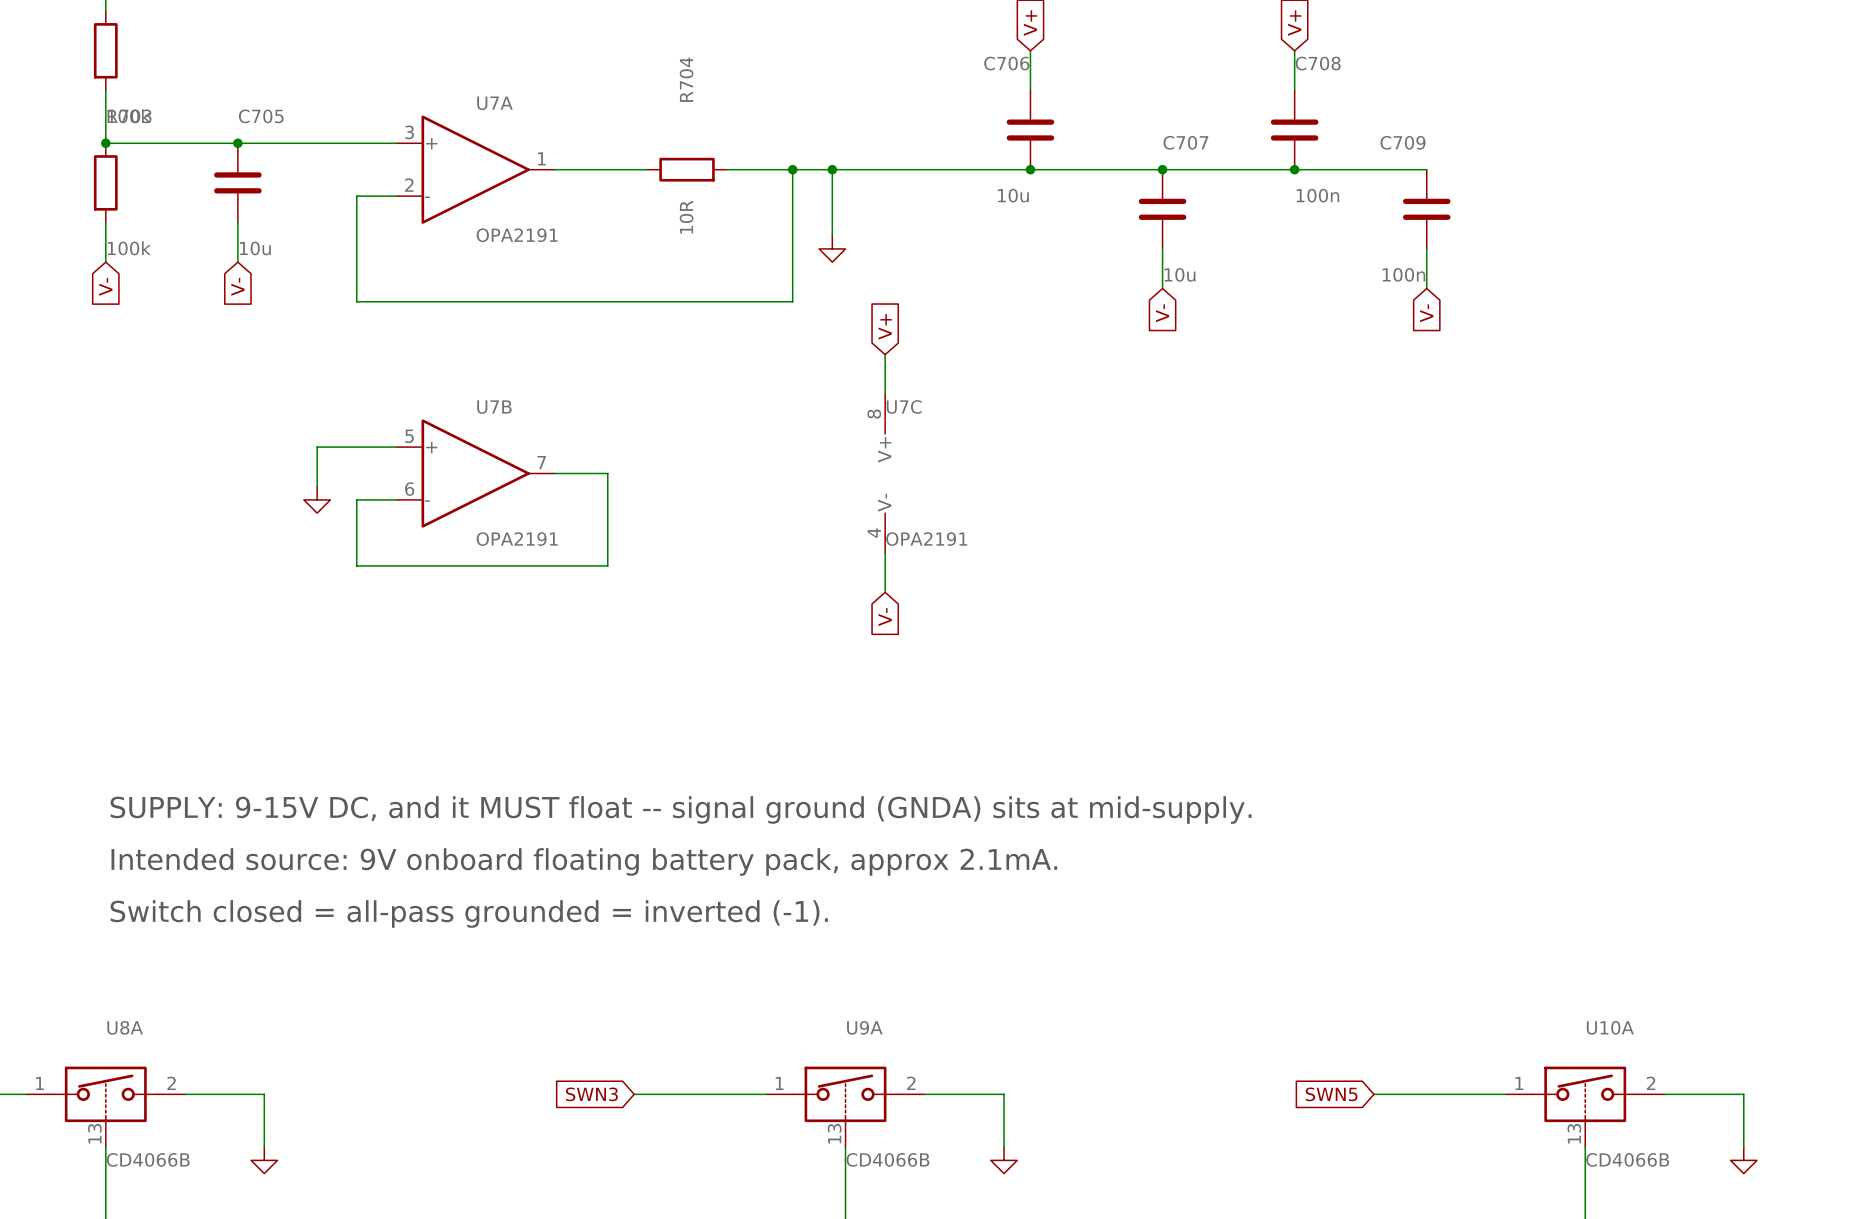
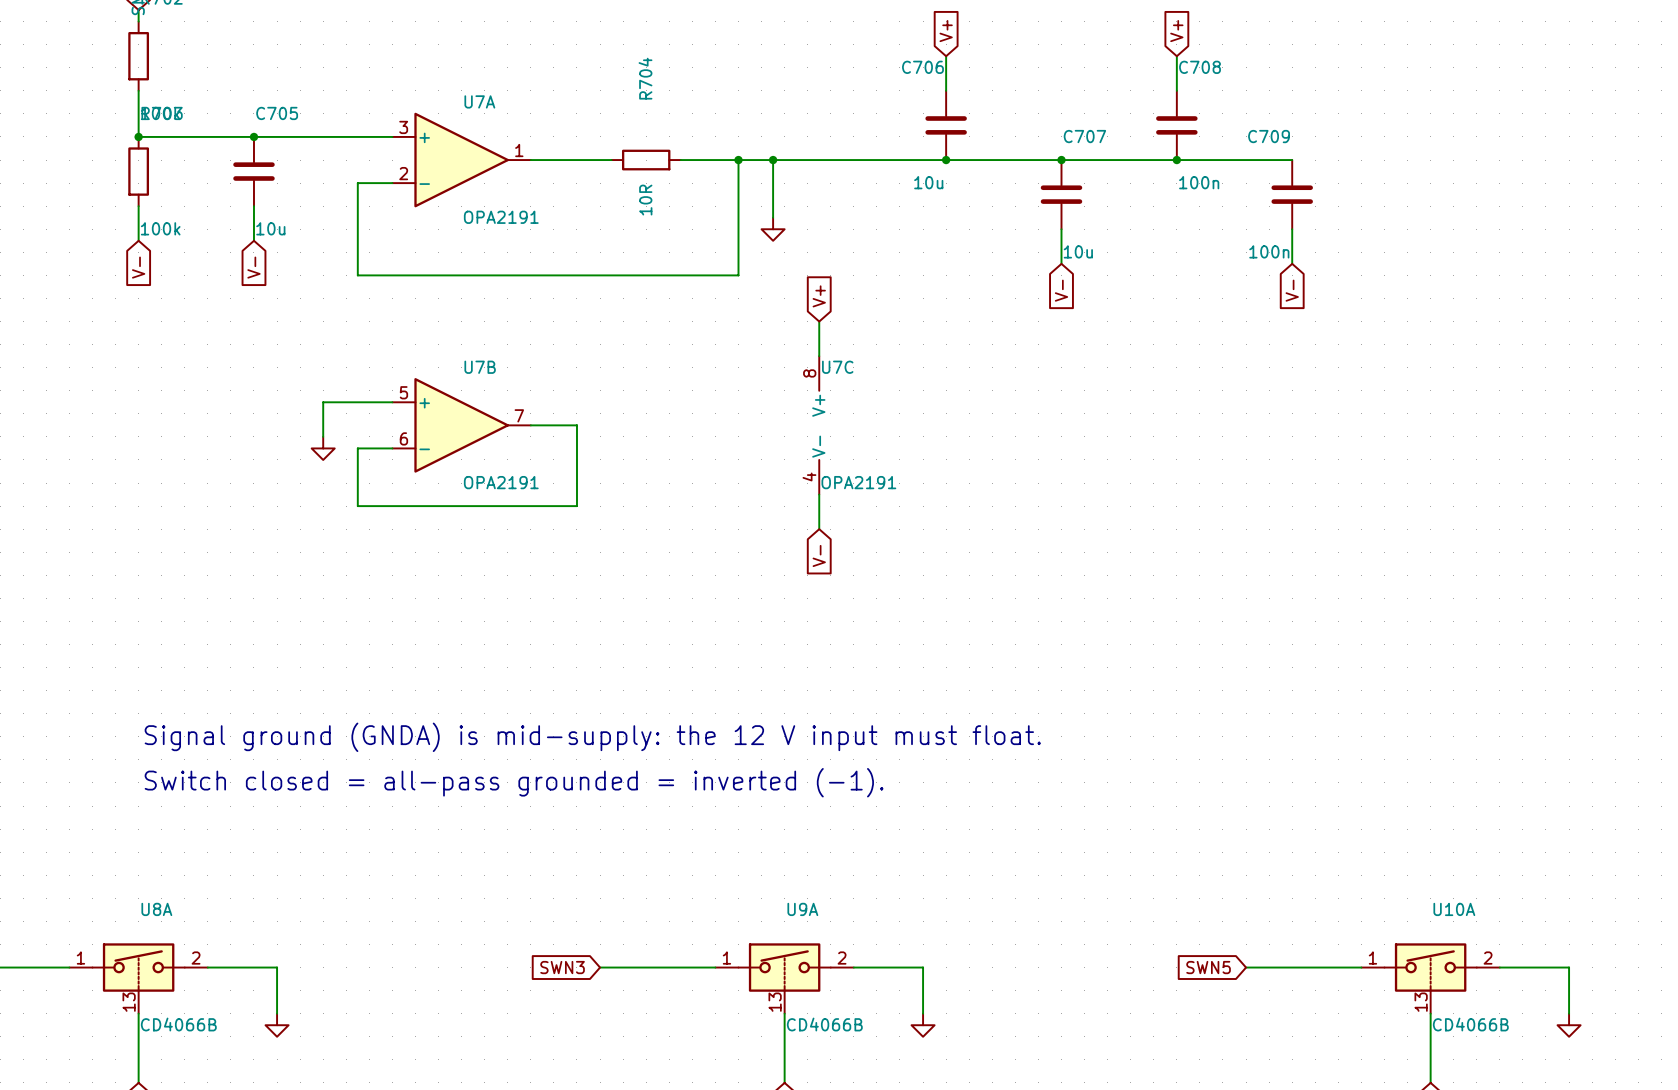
text: SUPPLY: 9-15V DC, and it MUST float -- signal ground (GNDA) sits at mid-supply. (681, 809) -> none
text: none -> Signal ground (GNDA) is mid-supply: the 12 V input must float. (592, 737)
text: Intended source: 9V onboard floating battery pack, approx 2.1mA. (584, 861) -> none
text position: Switch closed = all-pass grounded = inverted (-1). (469, 913) -> Switch closed = all-pass grounded = inverted (-1). (514, 782)

